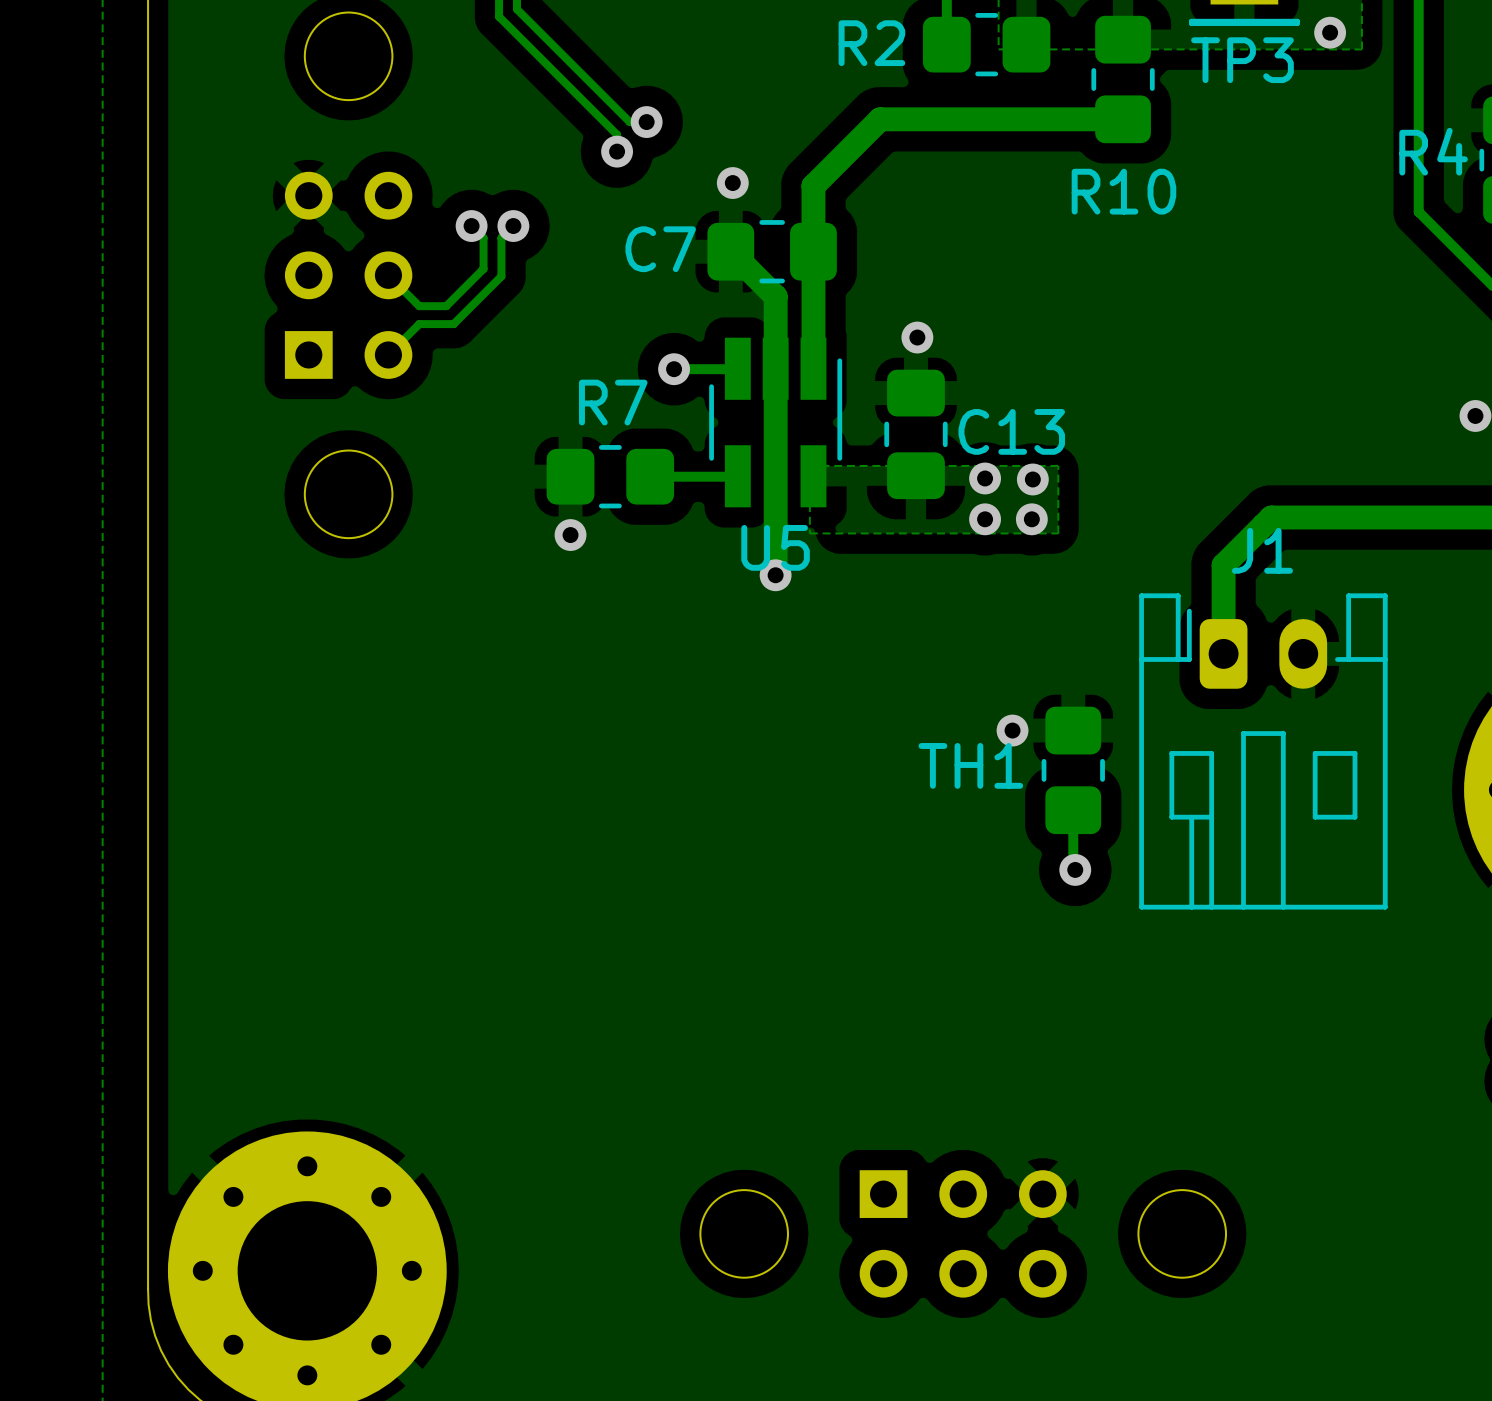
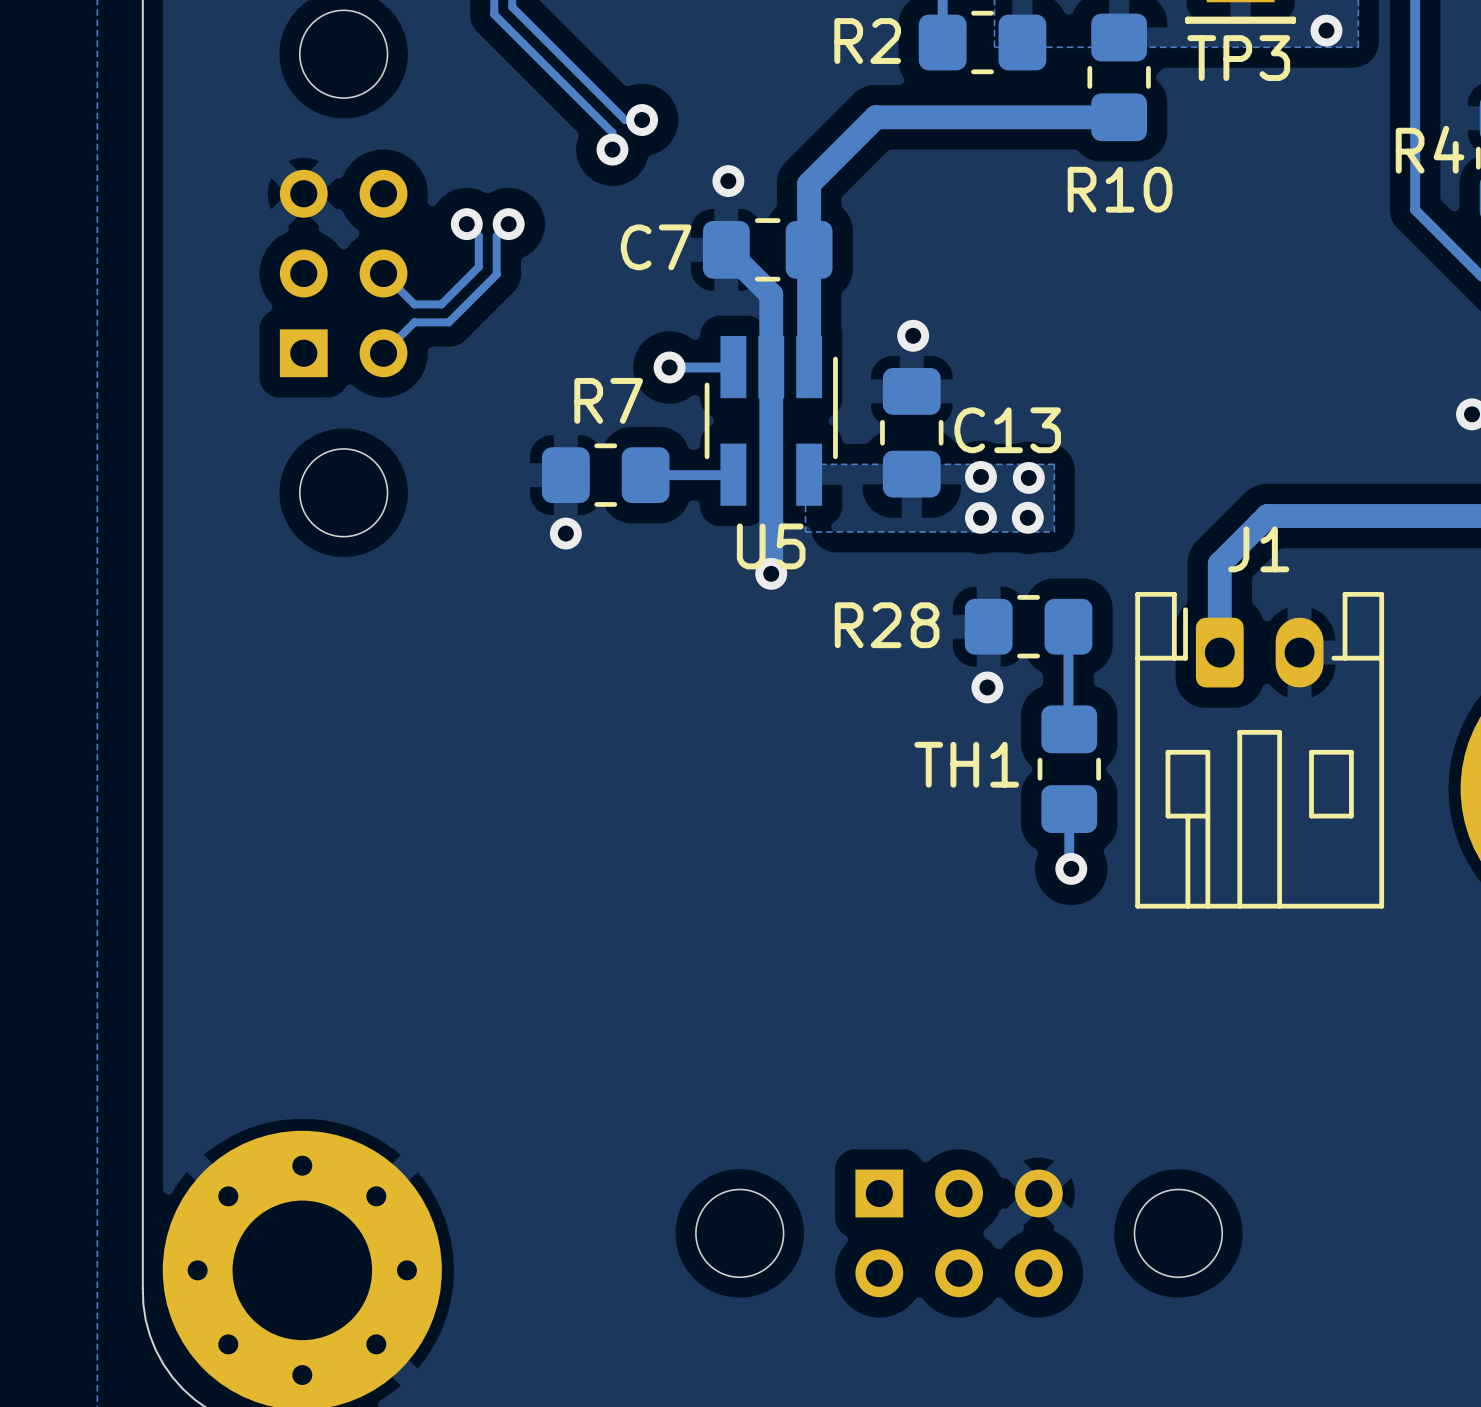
R28: none -> (1028, 626)
track: none -> (1068, 626) (1069, 729)
via position: (1012, 730) -> (987, 687)

